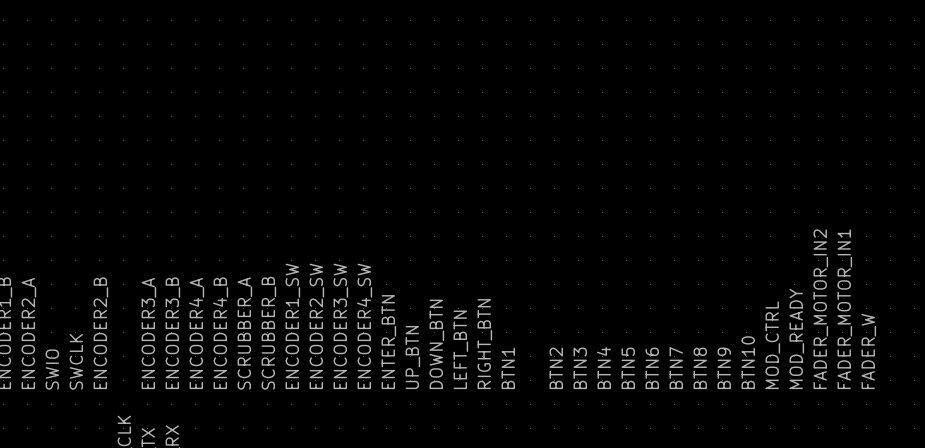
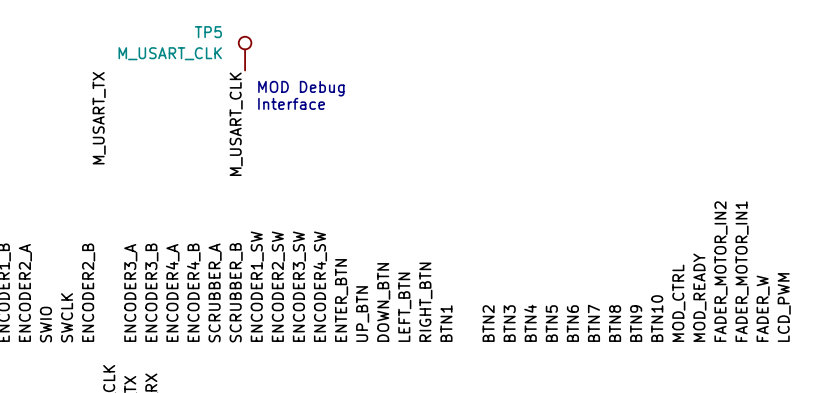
TP5: none -> M_USART_CLK (245, 53)
text: none -> MOD Debug (301, 88)
text: none -> Interface (291, 103)
label: none -> M_USART_TX (99, 118)
label: none -> M_USART_CLK (236, 124)
label: none -> LCD_PWM (784, 307)

